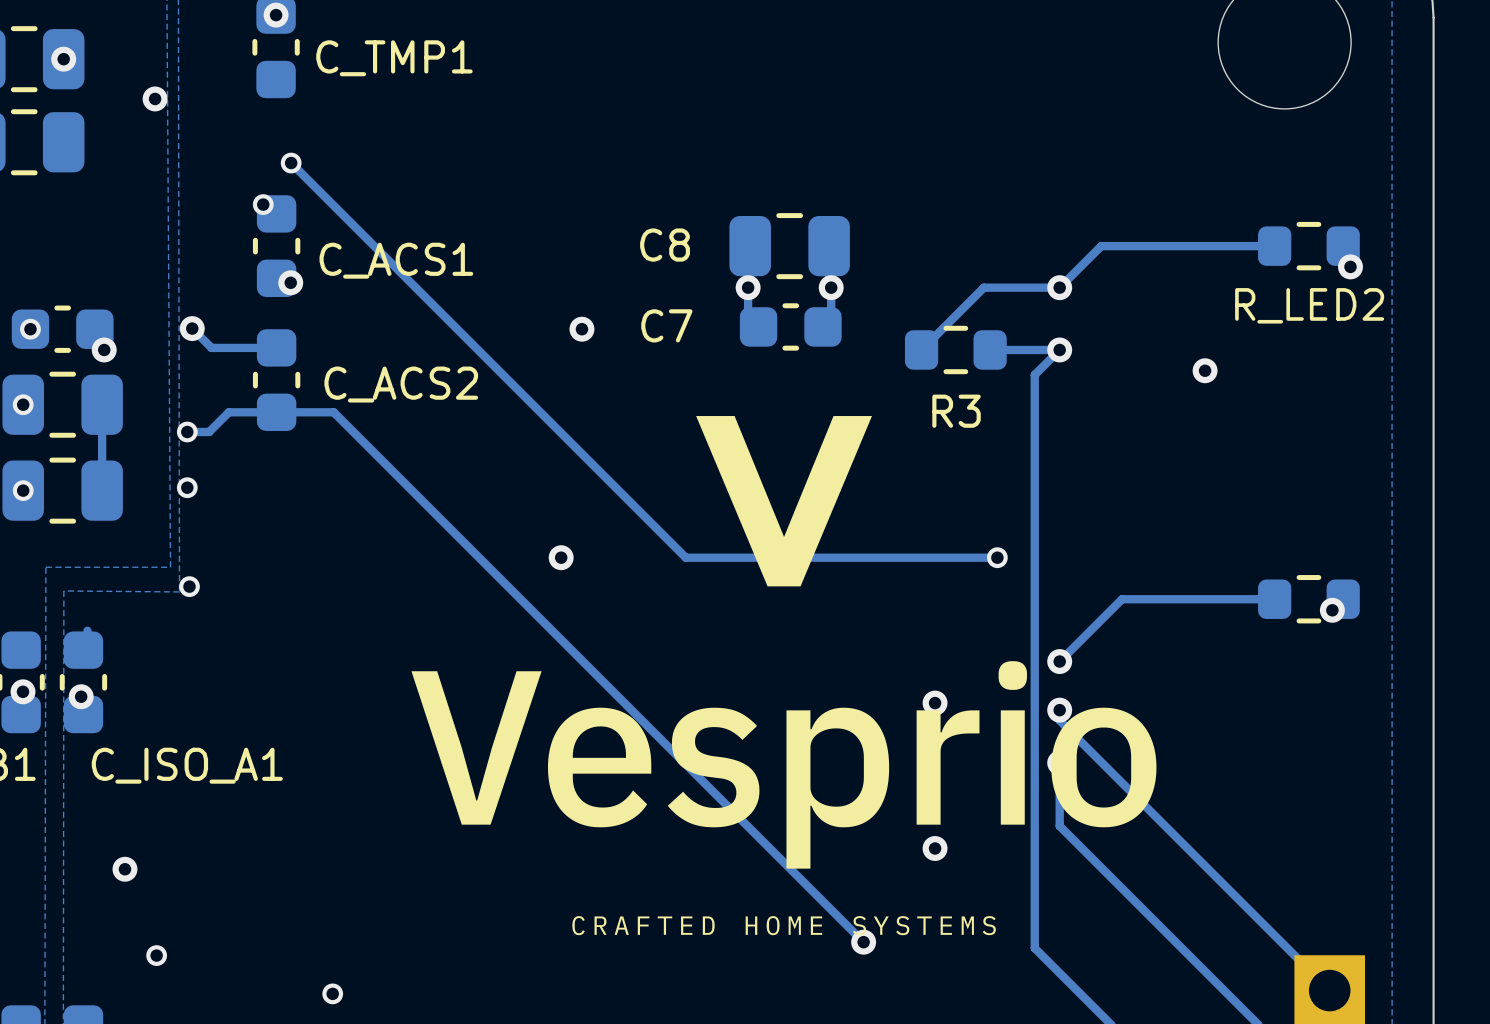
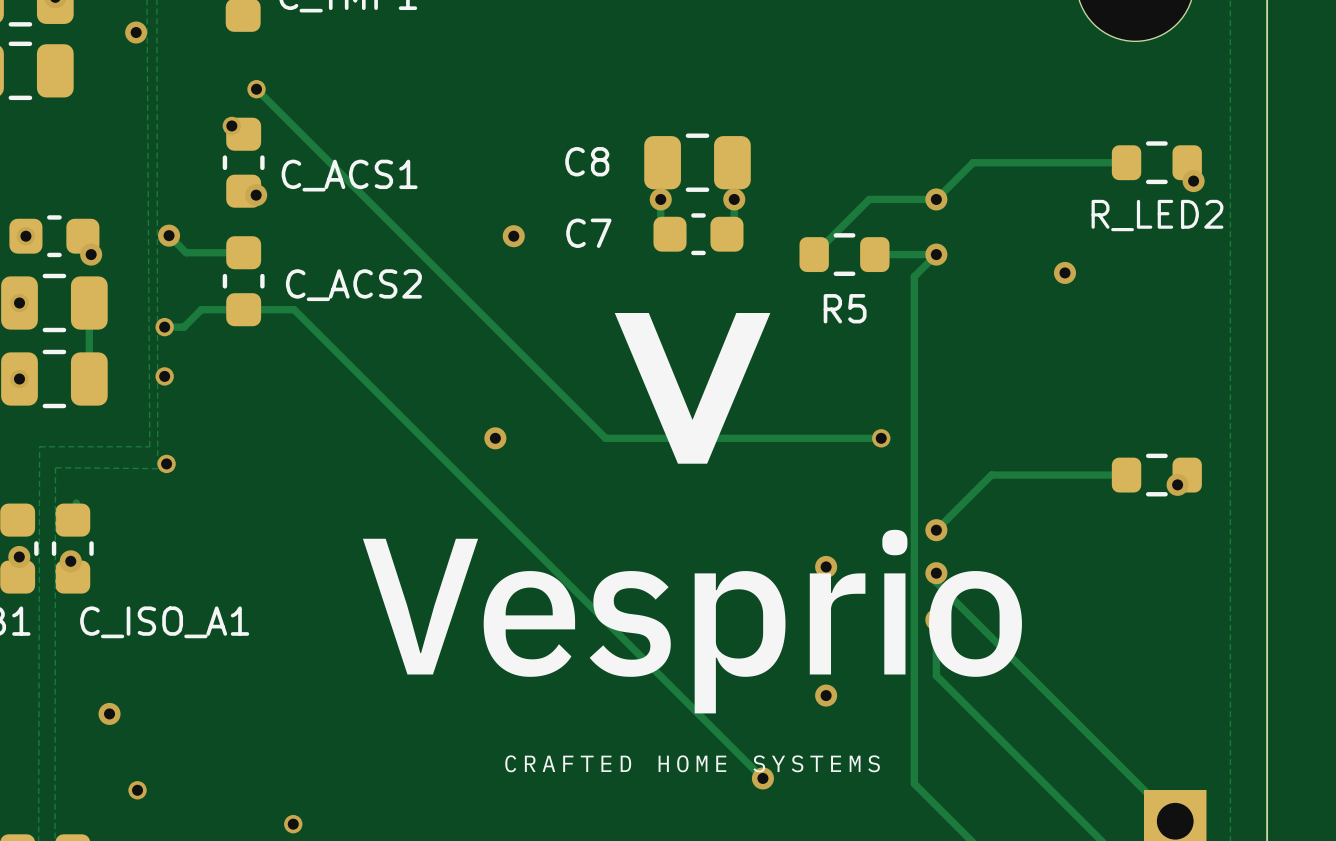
R3 name: R3 (956, 411) -> R5 (845, 308)

